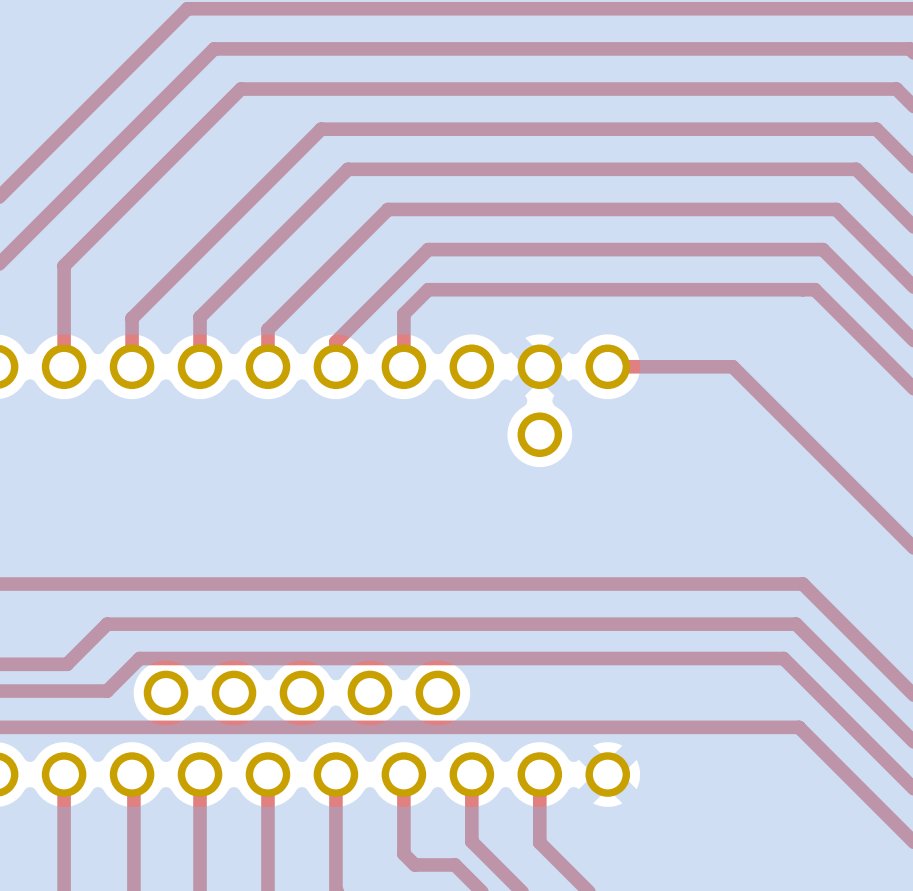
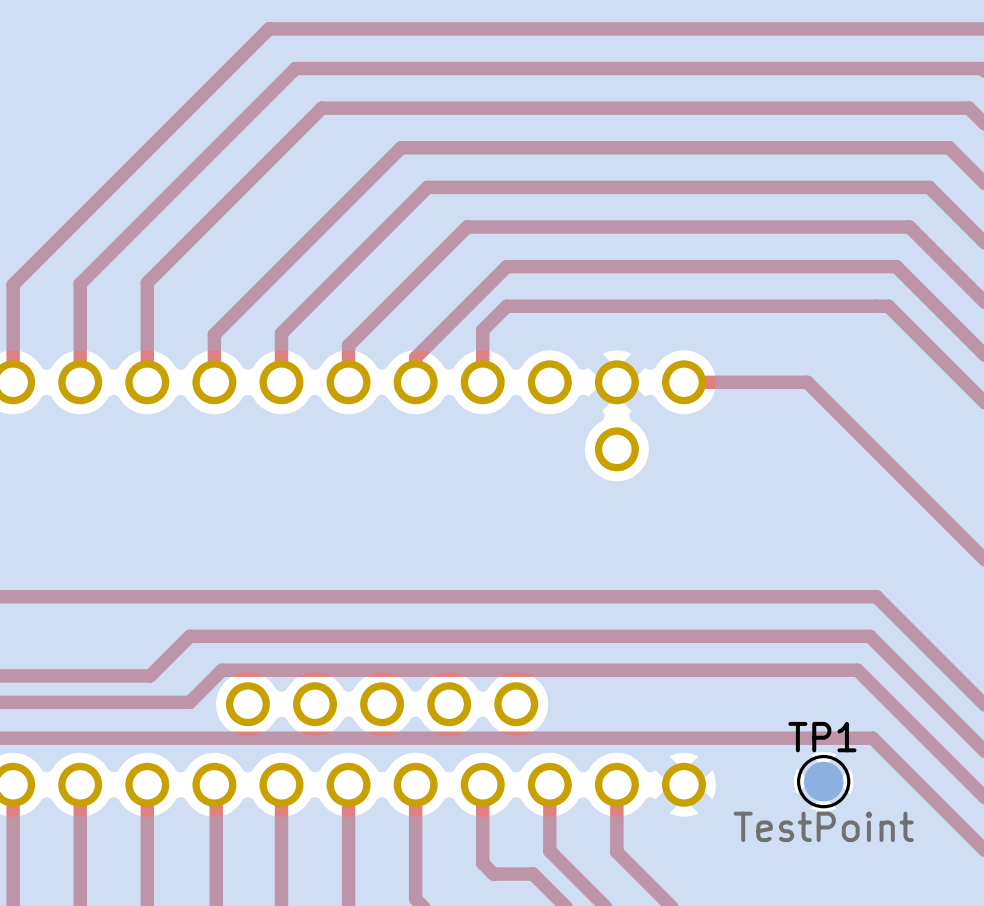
TP1: none -> TestPoint (823, 781)

